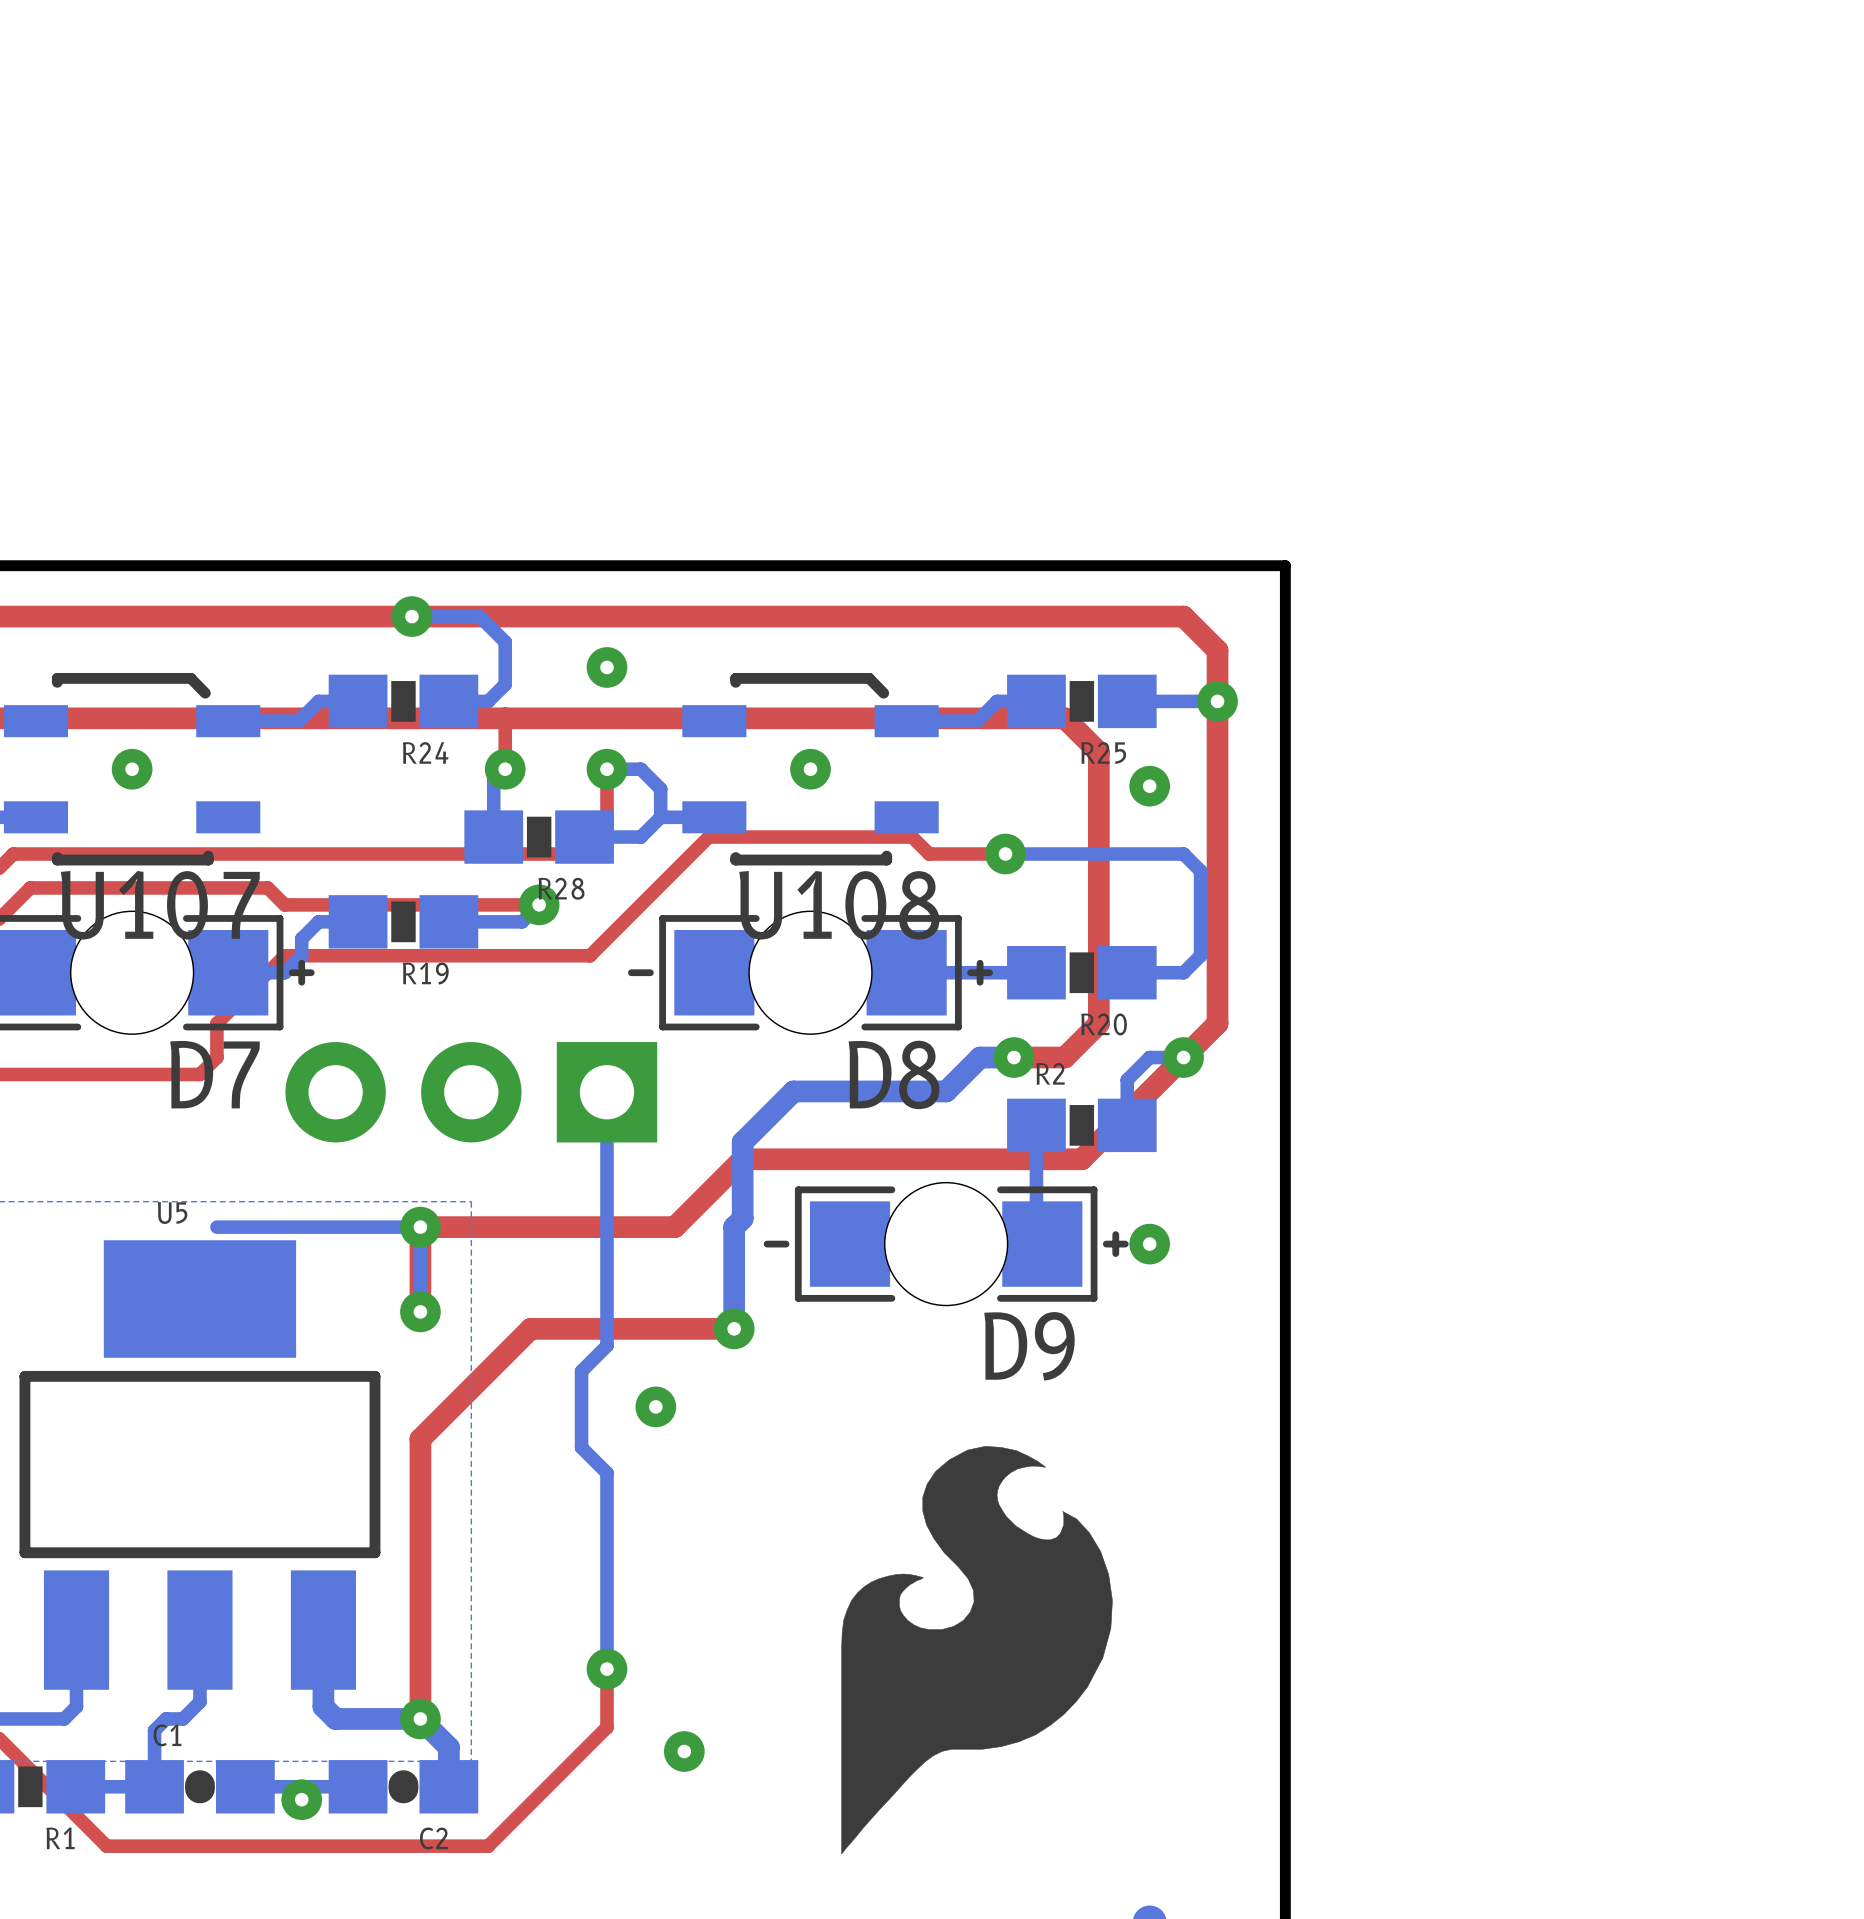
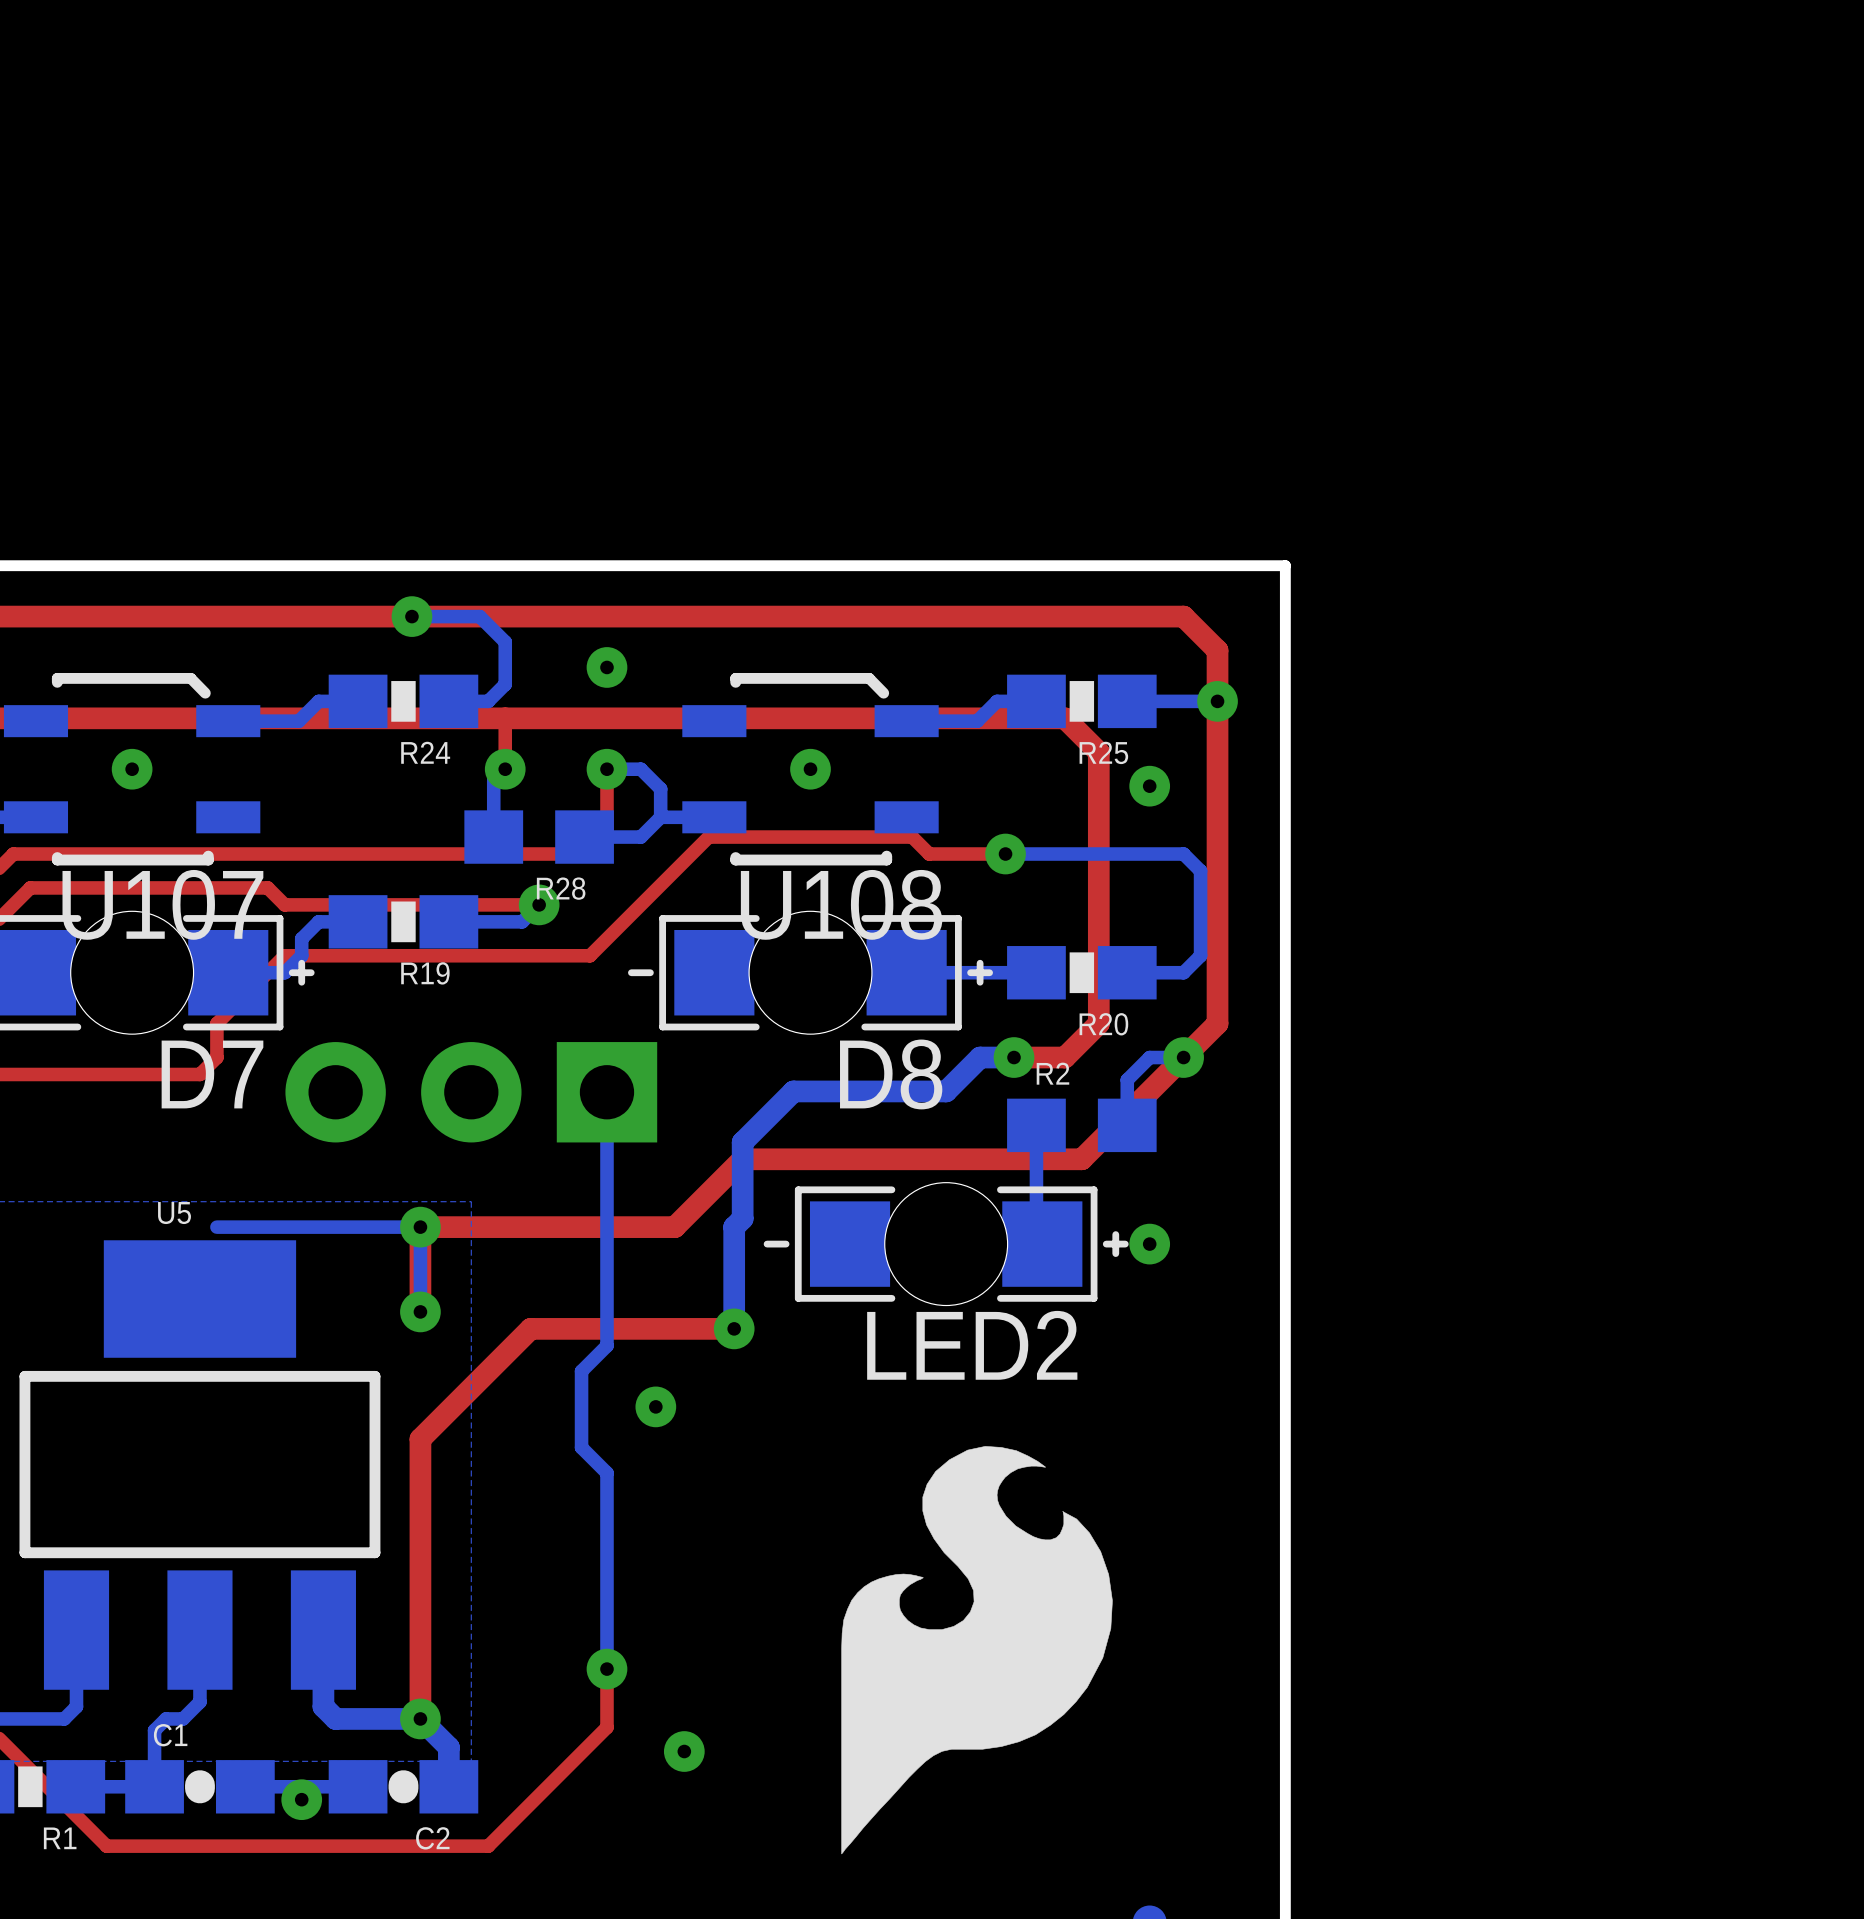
R28 footprint: [464, 810, 614, 864] -> [464, 810, 614, 864]
R2 footprint: [1007, 1098, 1157, 1153] -> [1007, 1098, 1157, 1153]
D9 name: D9 (1029, 1346) -> LED2 (972, 1345)

